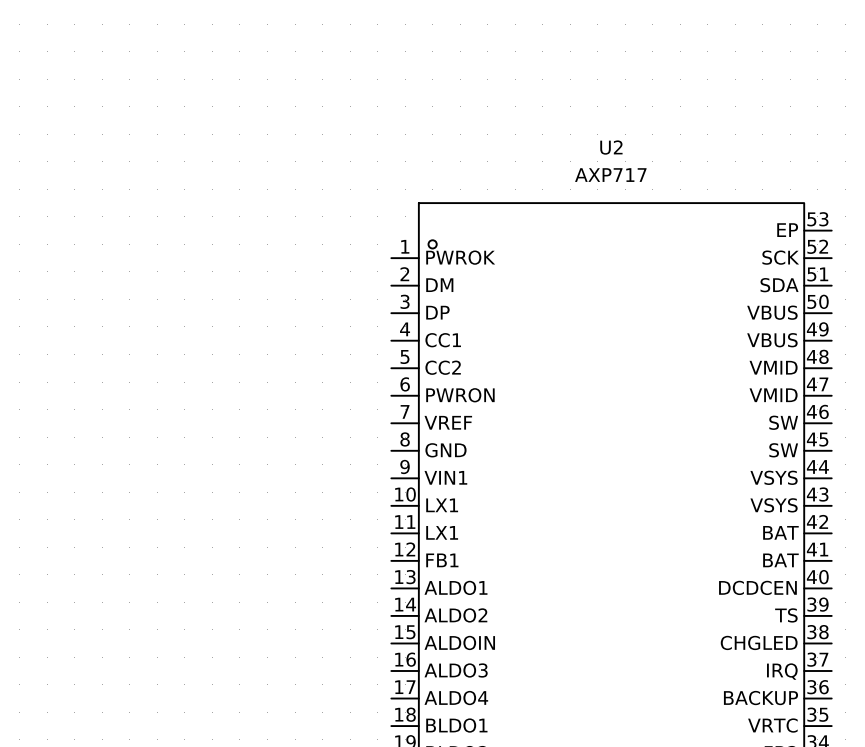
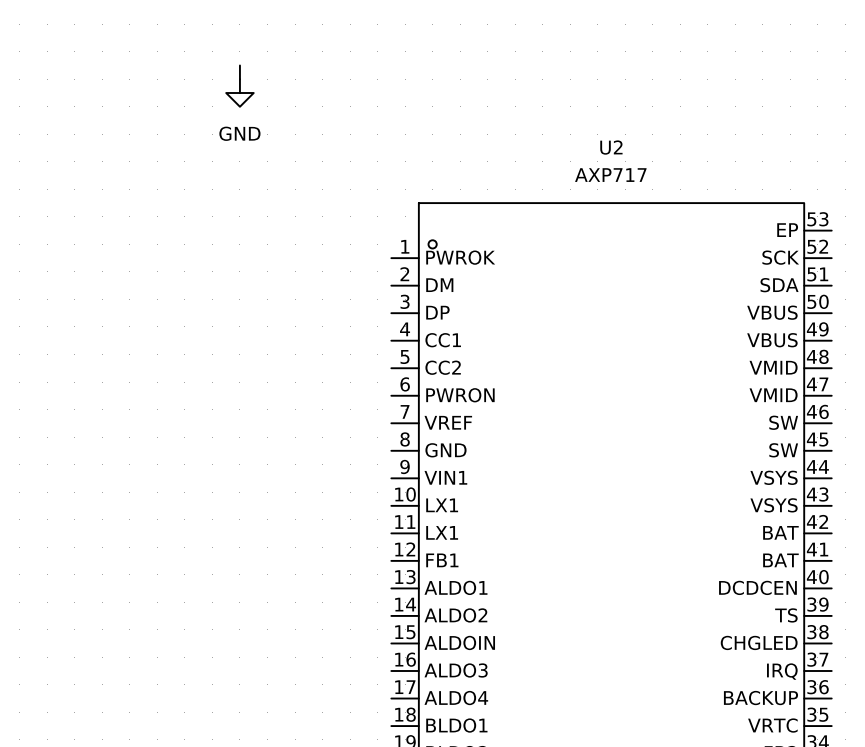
wire: none -> (239, 65) (239, 79)
power symbol: none -> GND (239, 93)

